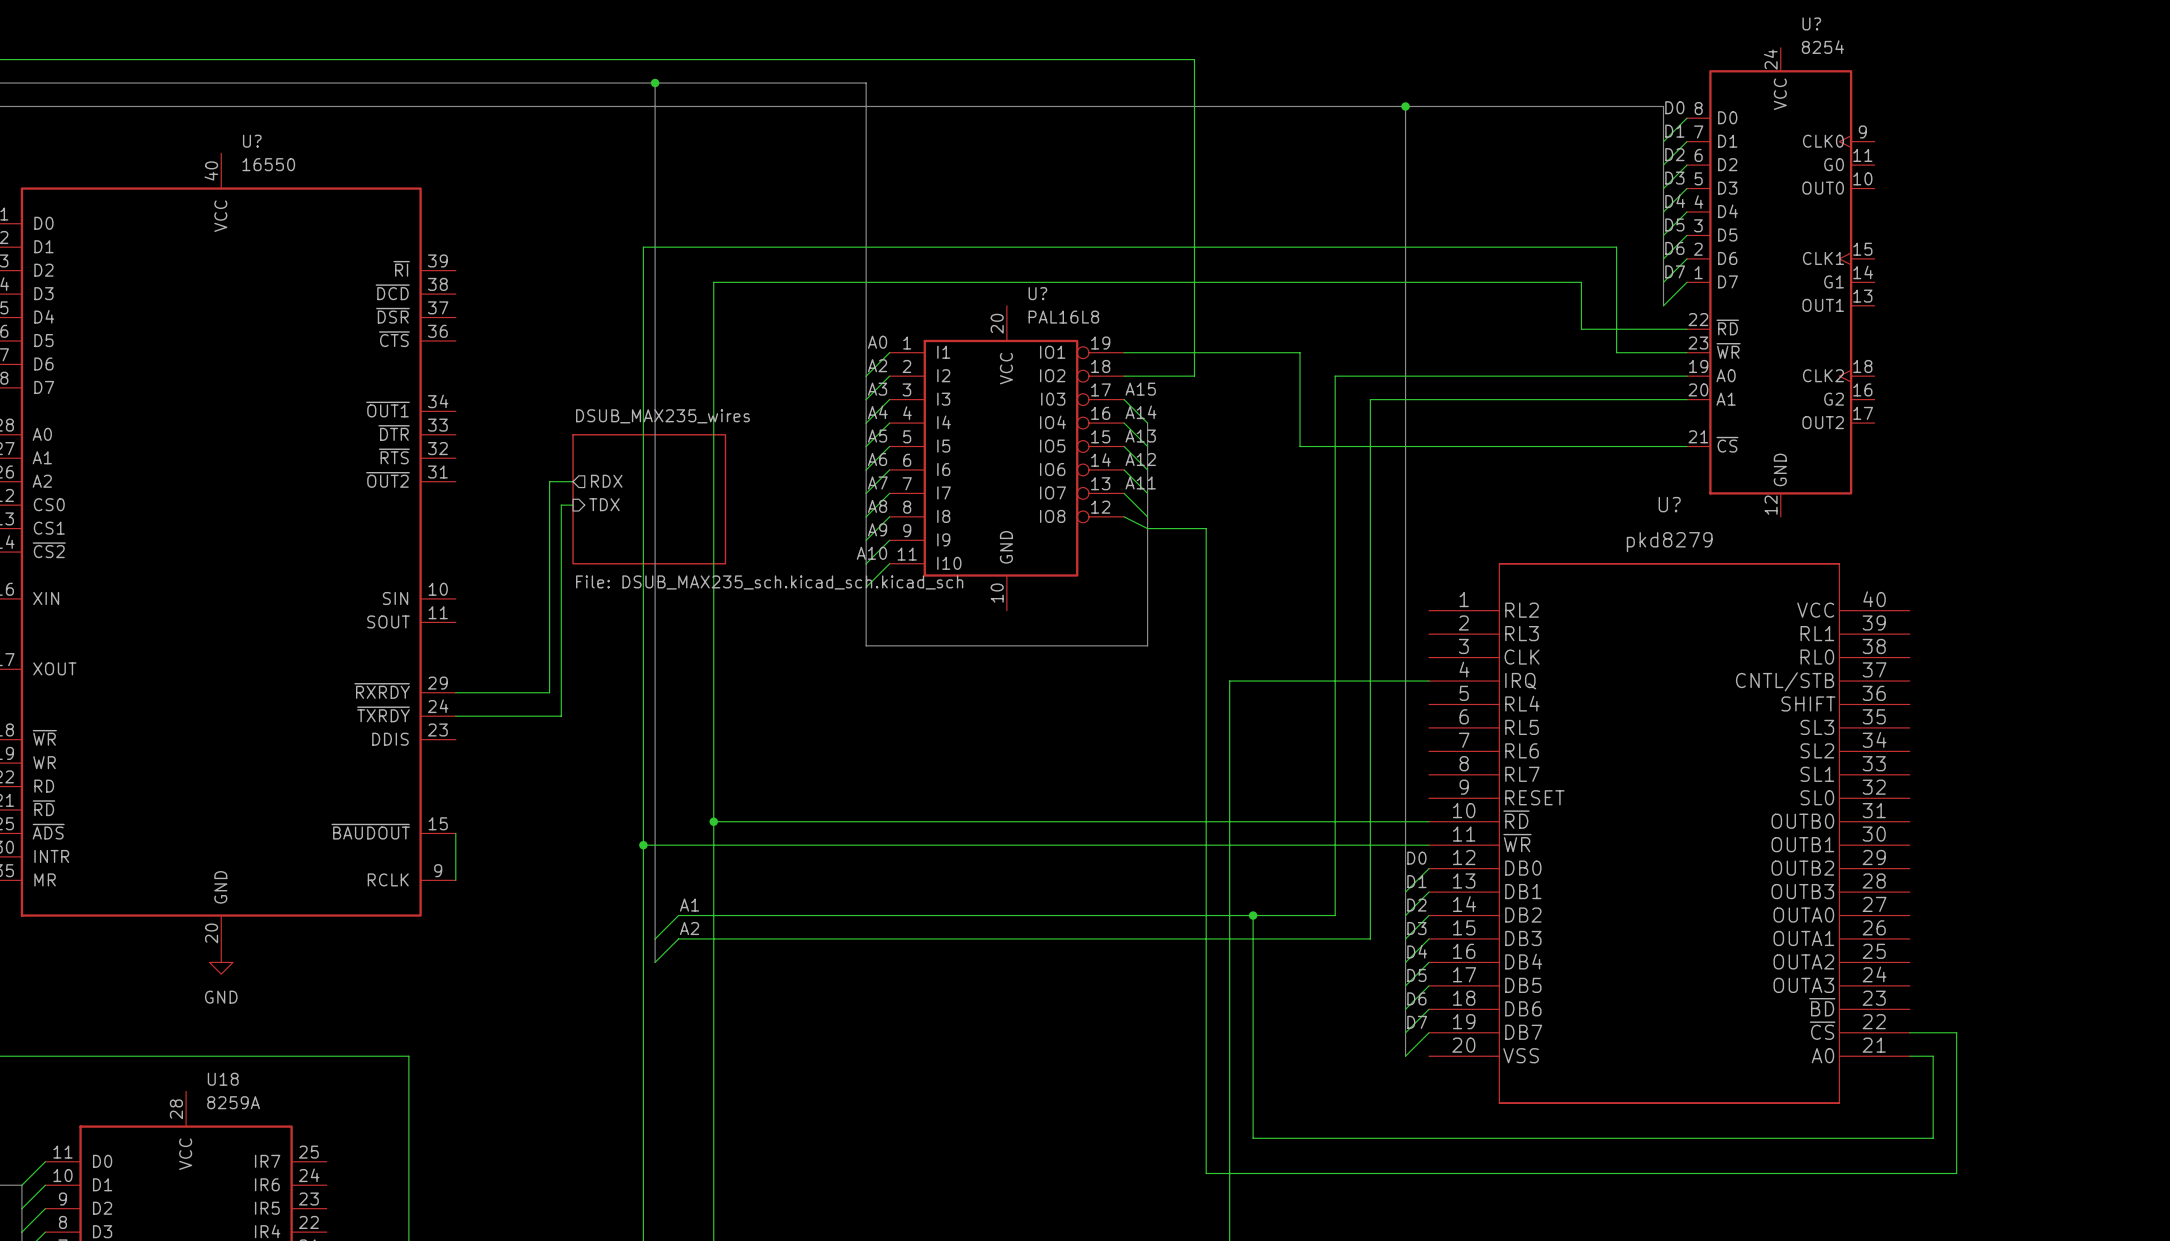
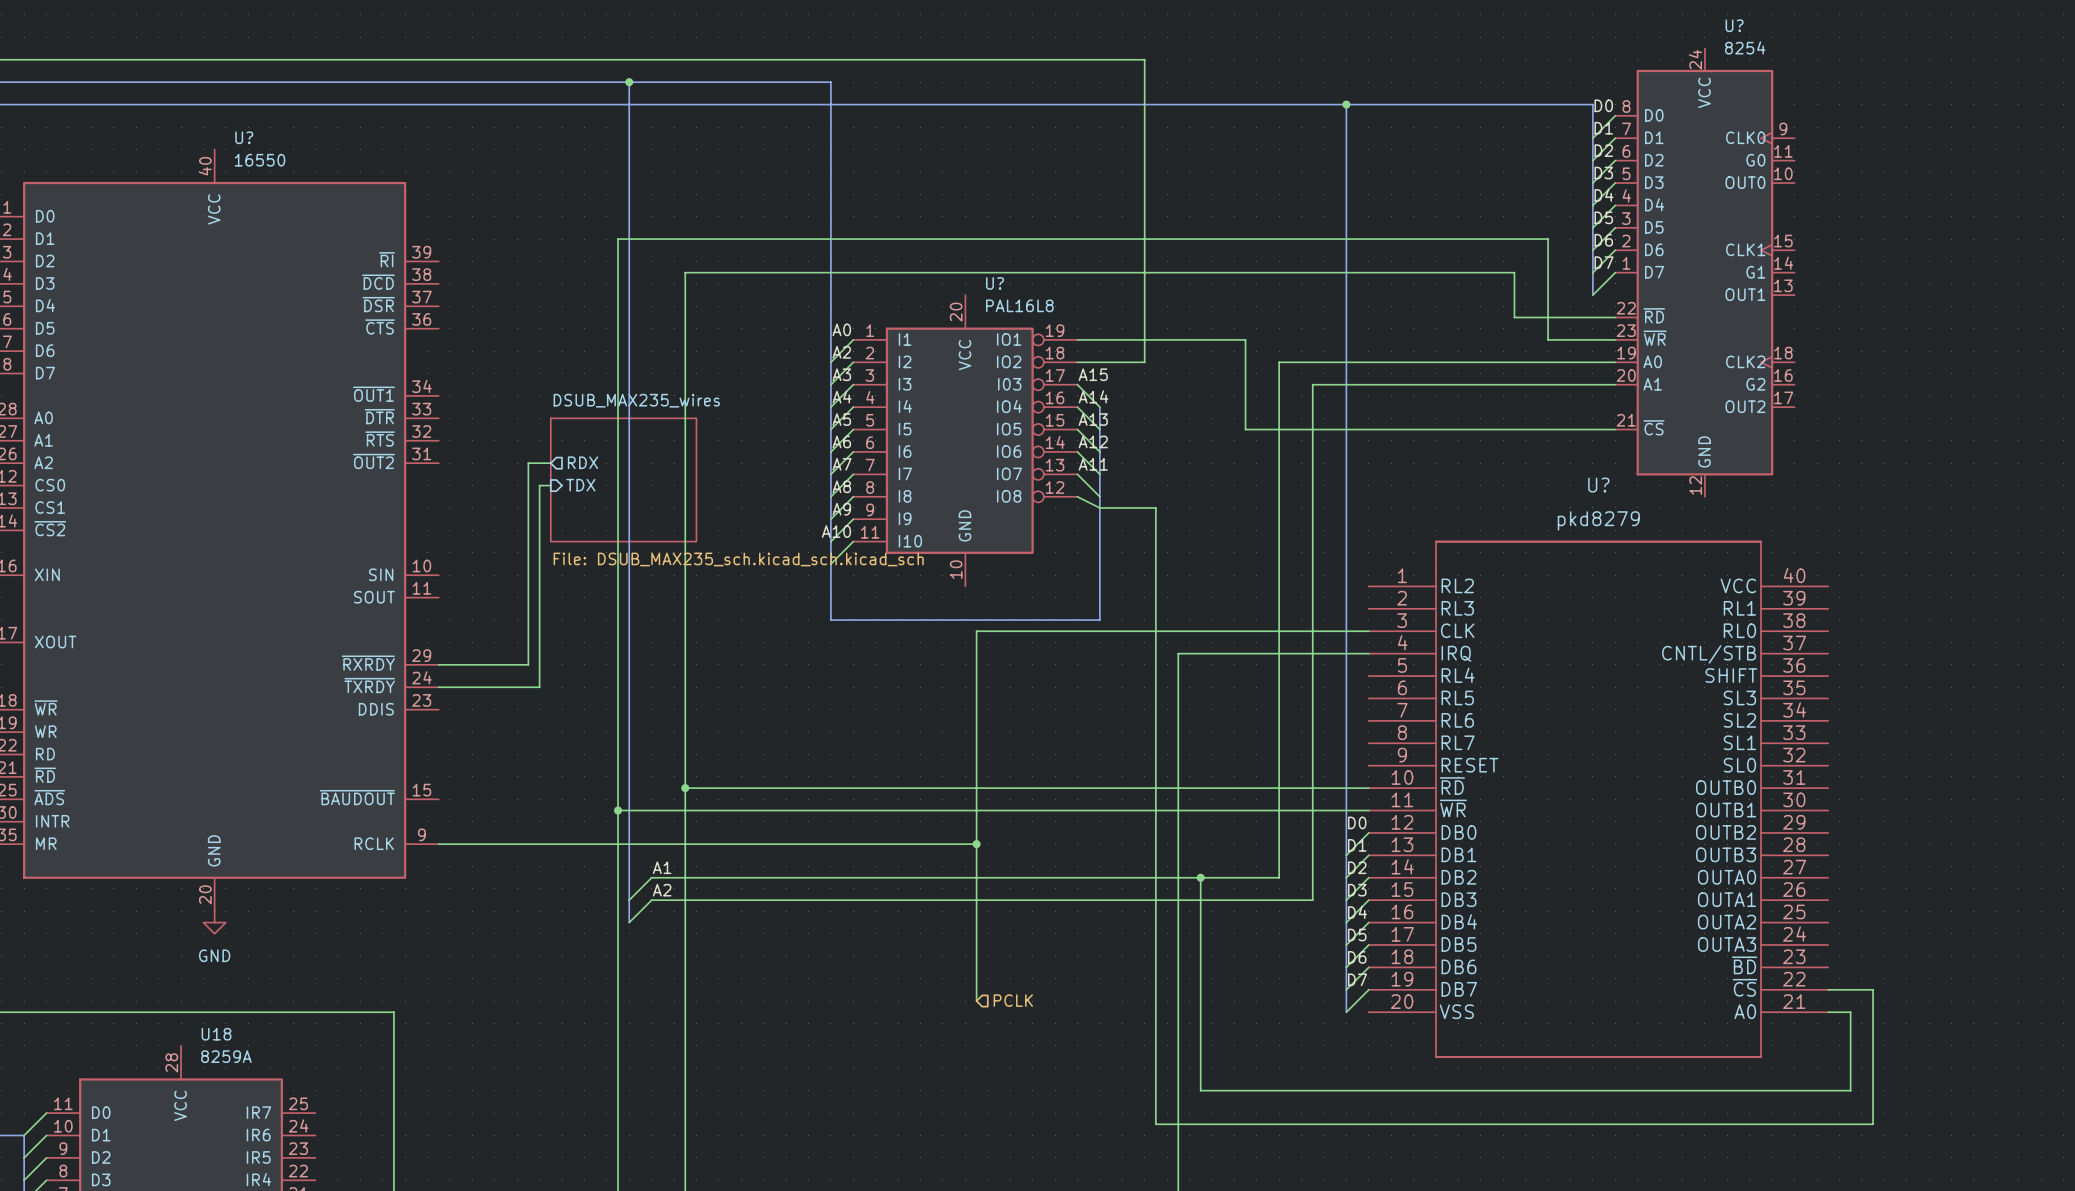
wire: none -> (1368, 631) (976, 631) (976, 1001)
wire: (455, 833) (455, 880) -> (976, 844) (438, 844)
junction: none -> (976, 844)
hierarchical label: none -> PCLK (1013, 1000)

